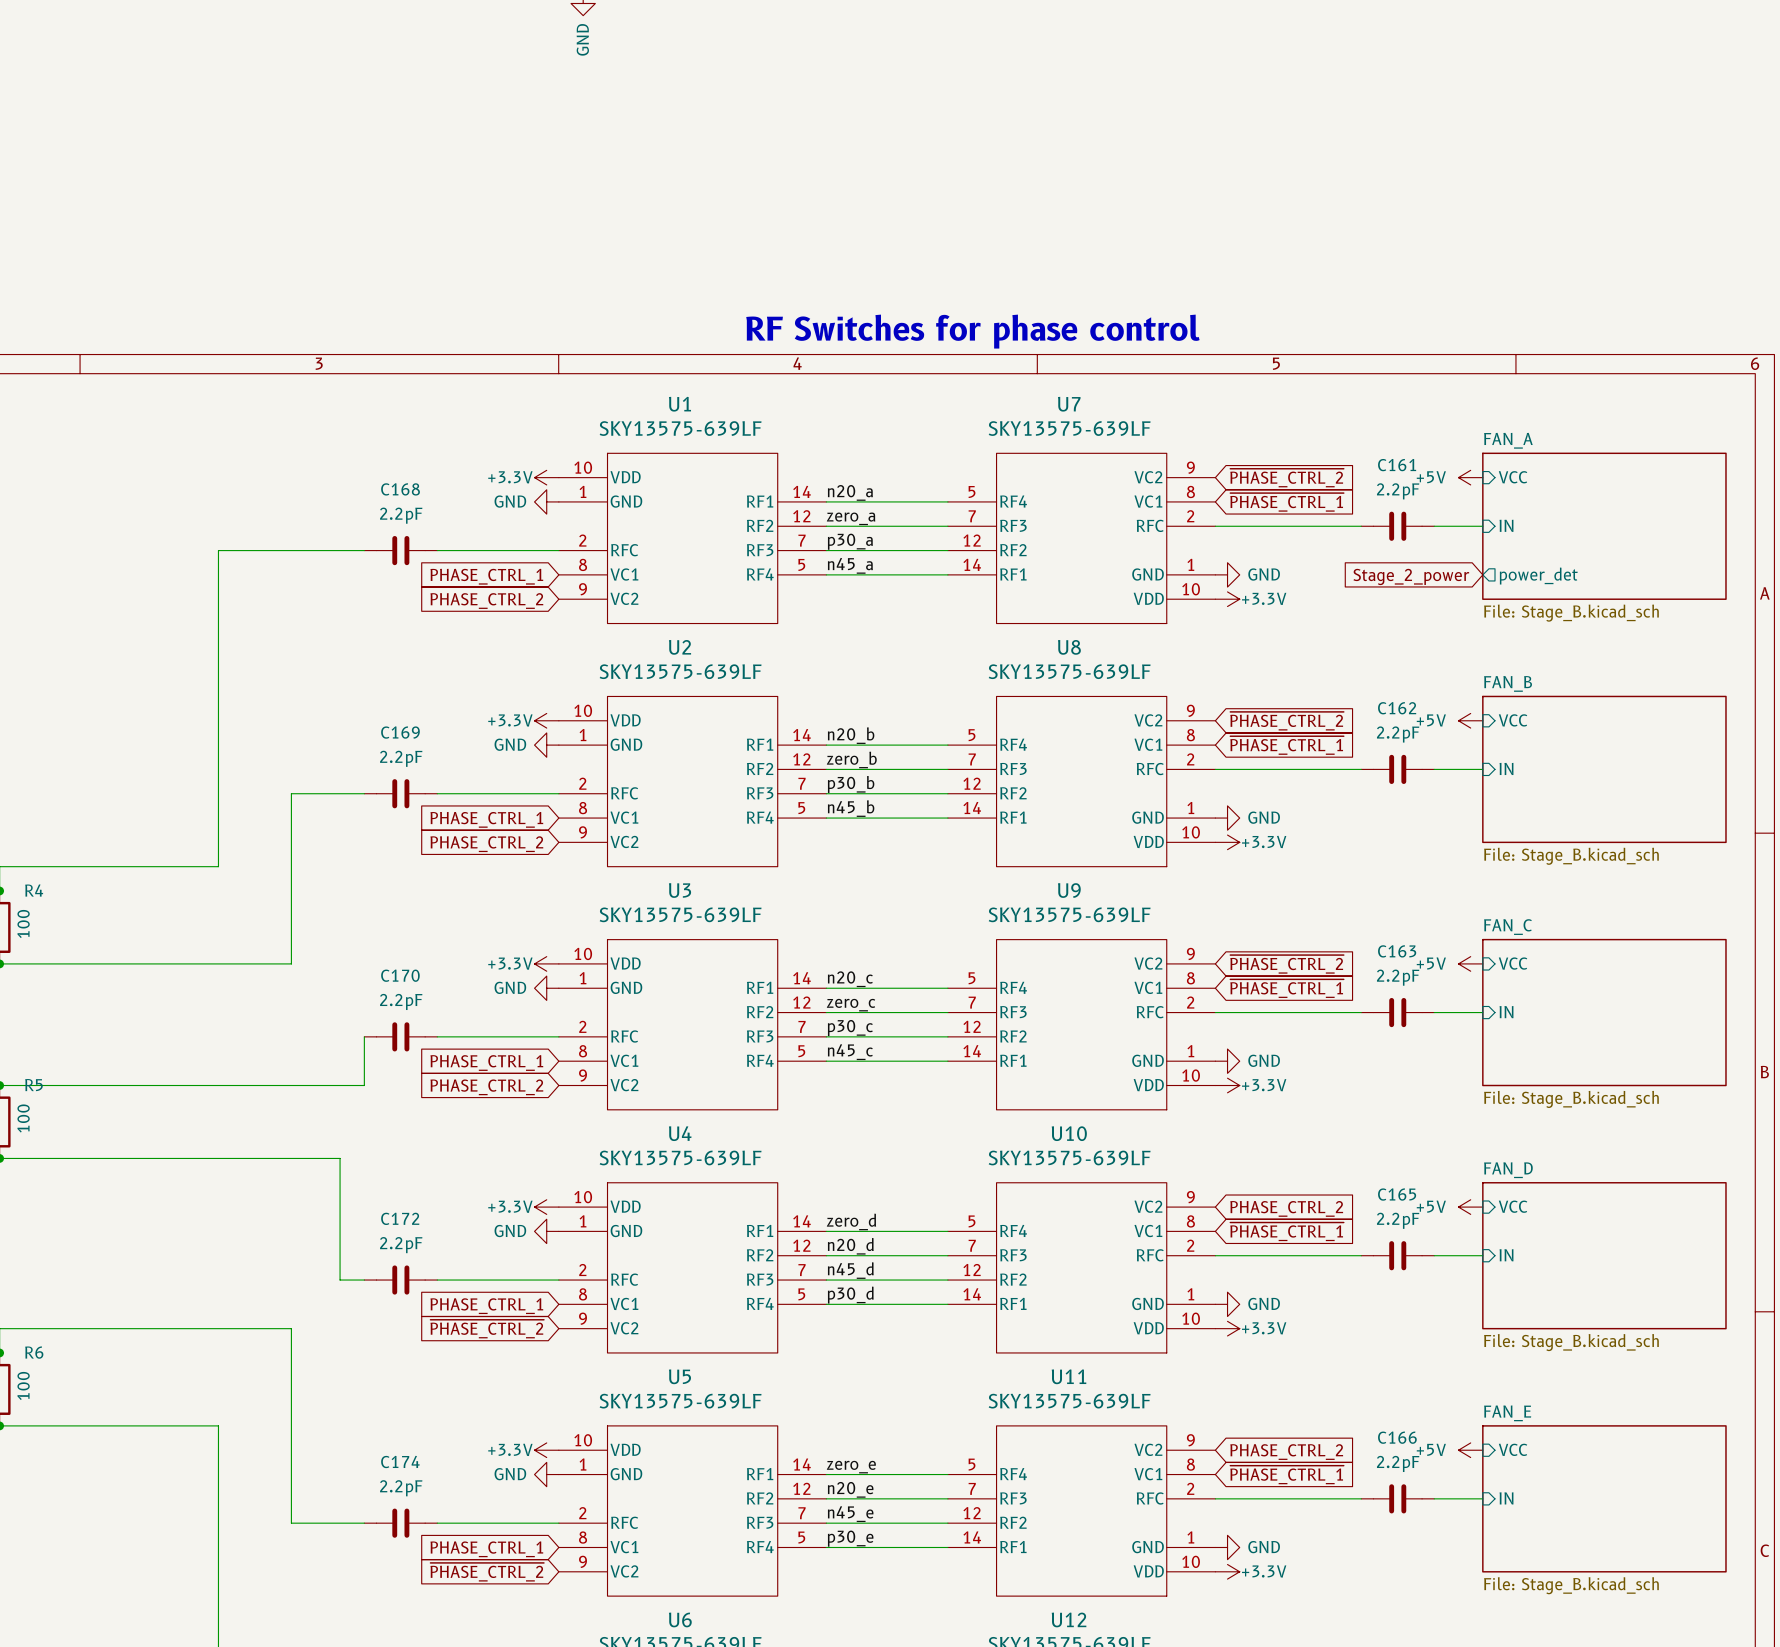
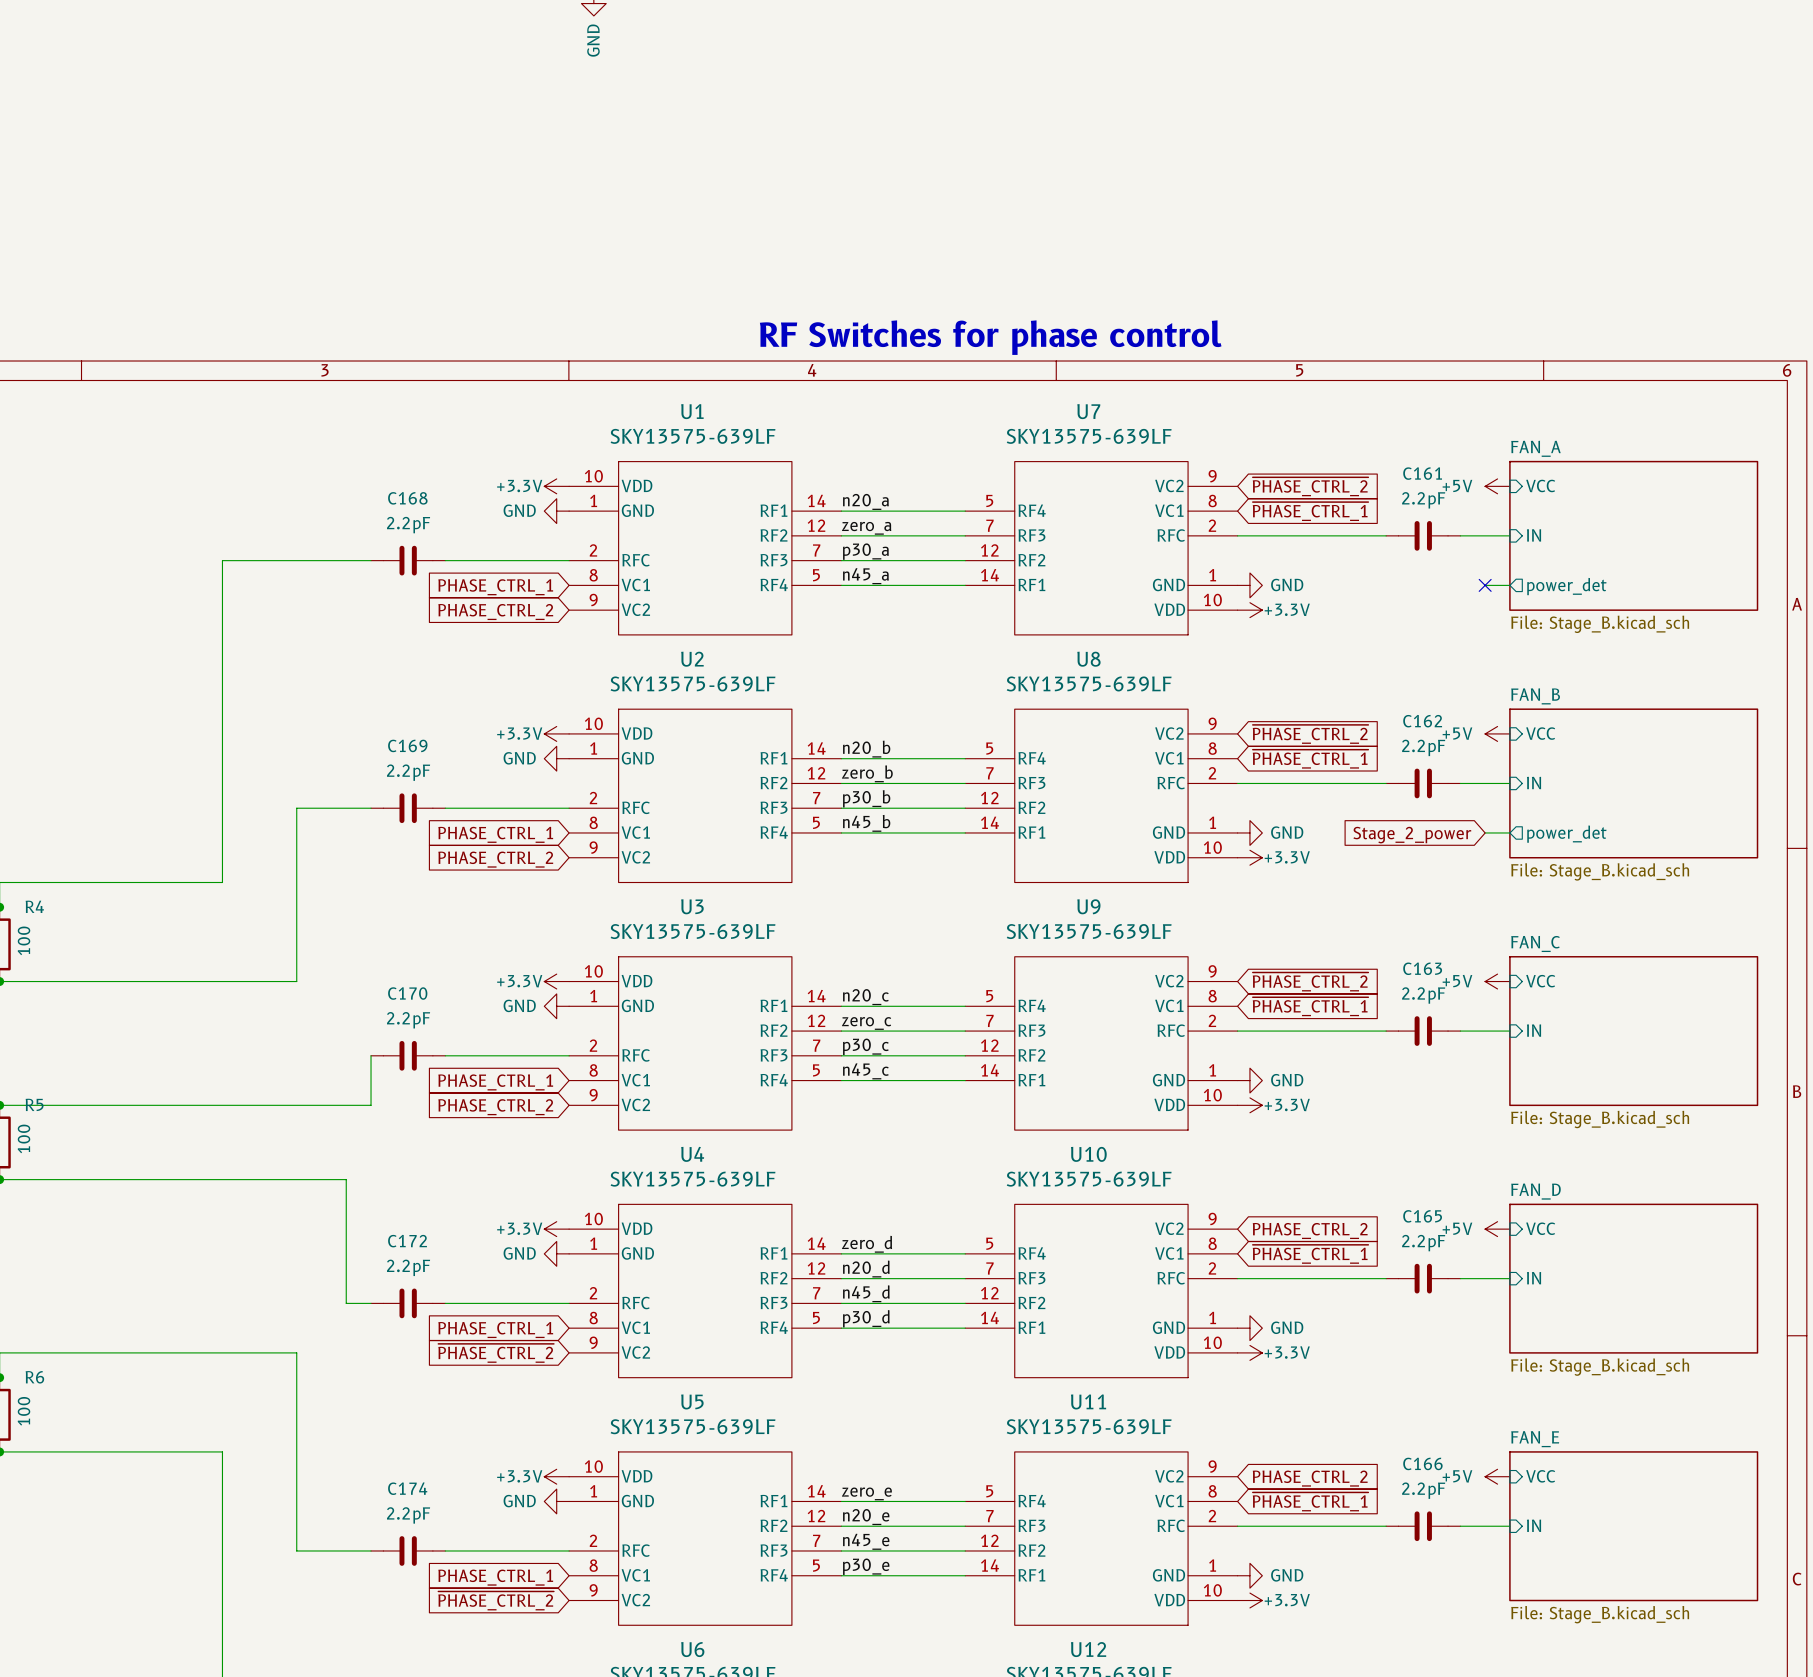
wire: none -> (1485, 585) (1509, 585)
no-connect mark: none -> (1485, 585)
global label: Stage_2_power (1411, 576) -> none
wire: none -> (1485, 832) (1509, 832)
sheet pin: none -> power_det (1566, 834)
global label: none -> Stage_2_power (1412, 835)

